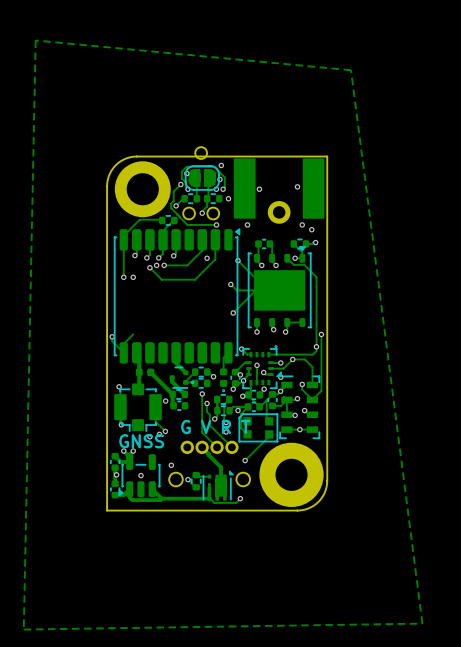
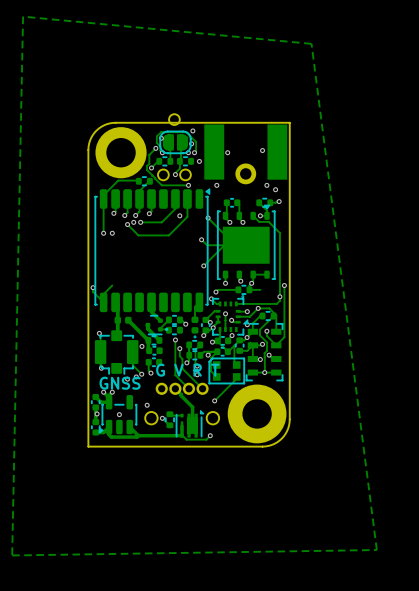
track: none -> (251, 283) (249, 289) (260, 289)
track: none -> (238, 289) (218, 289) (215, 292)
part: none -> (243, 289)
via: none -> (215, 292)
track: none -> (262, 315) (252, 323) (252, 331)
part: none -> (268, 315)
track: none -> (273, 315) (260, 329) (260, 335) (267, 342) (267, 350) (264, 353) (264, 372)
track: none -> (148, 362) (148, 370) (150, 373)
part: none -> (153, 362)
via: none -> (150, 373)

